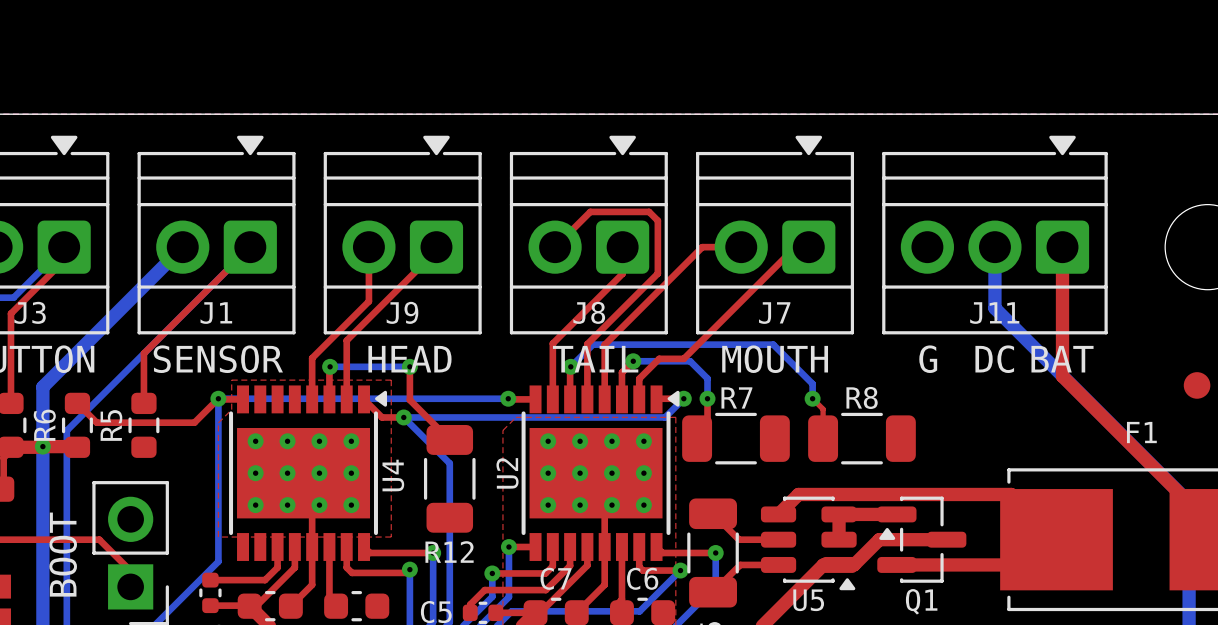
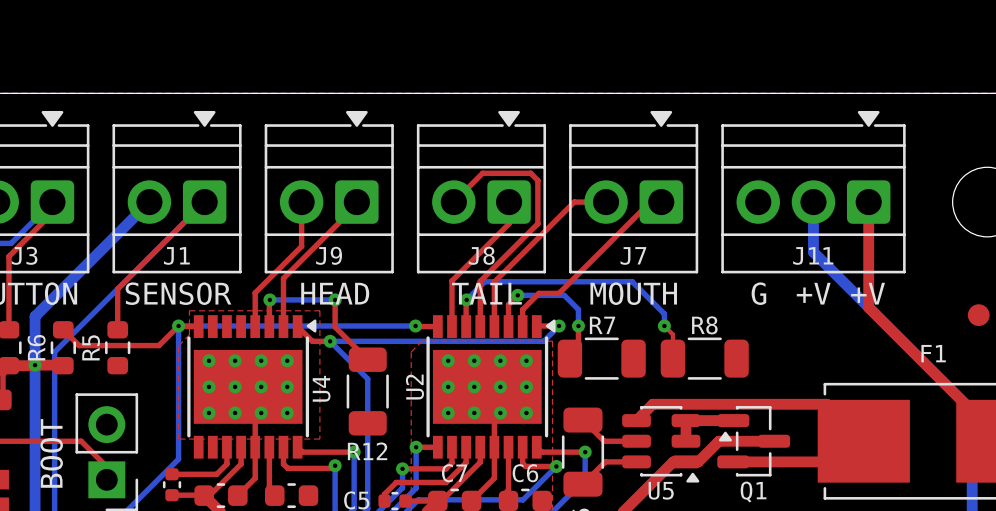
text: DC (994, 359) -> +V (813, 293)
text: BAT (1062, 359) -> +V (868, 293)

